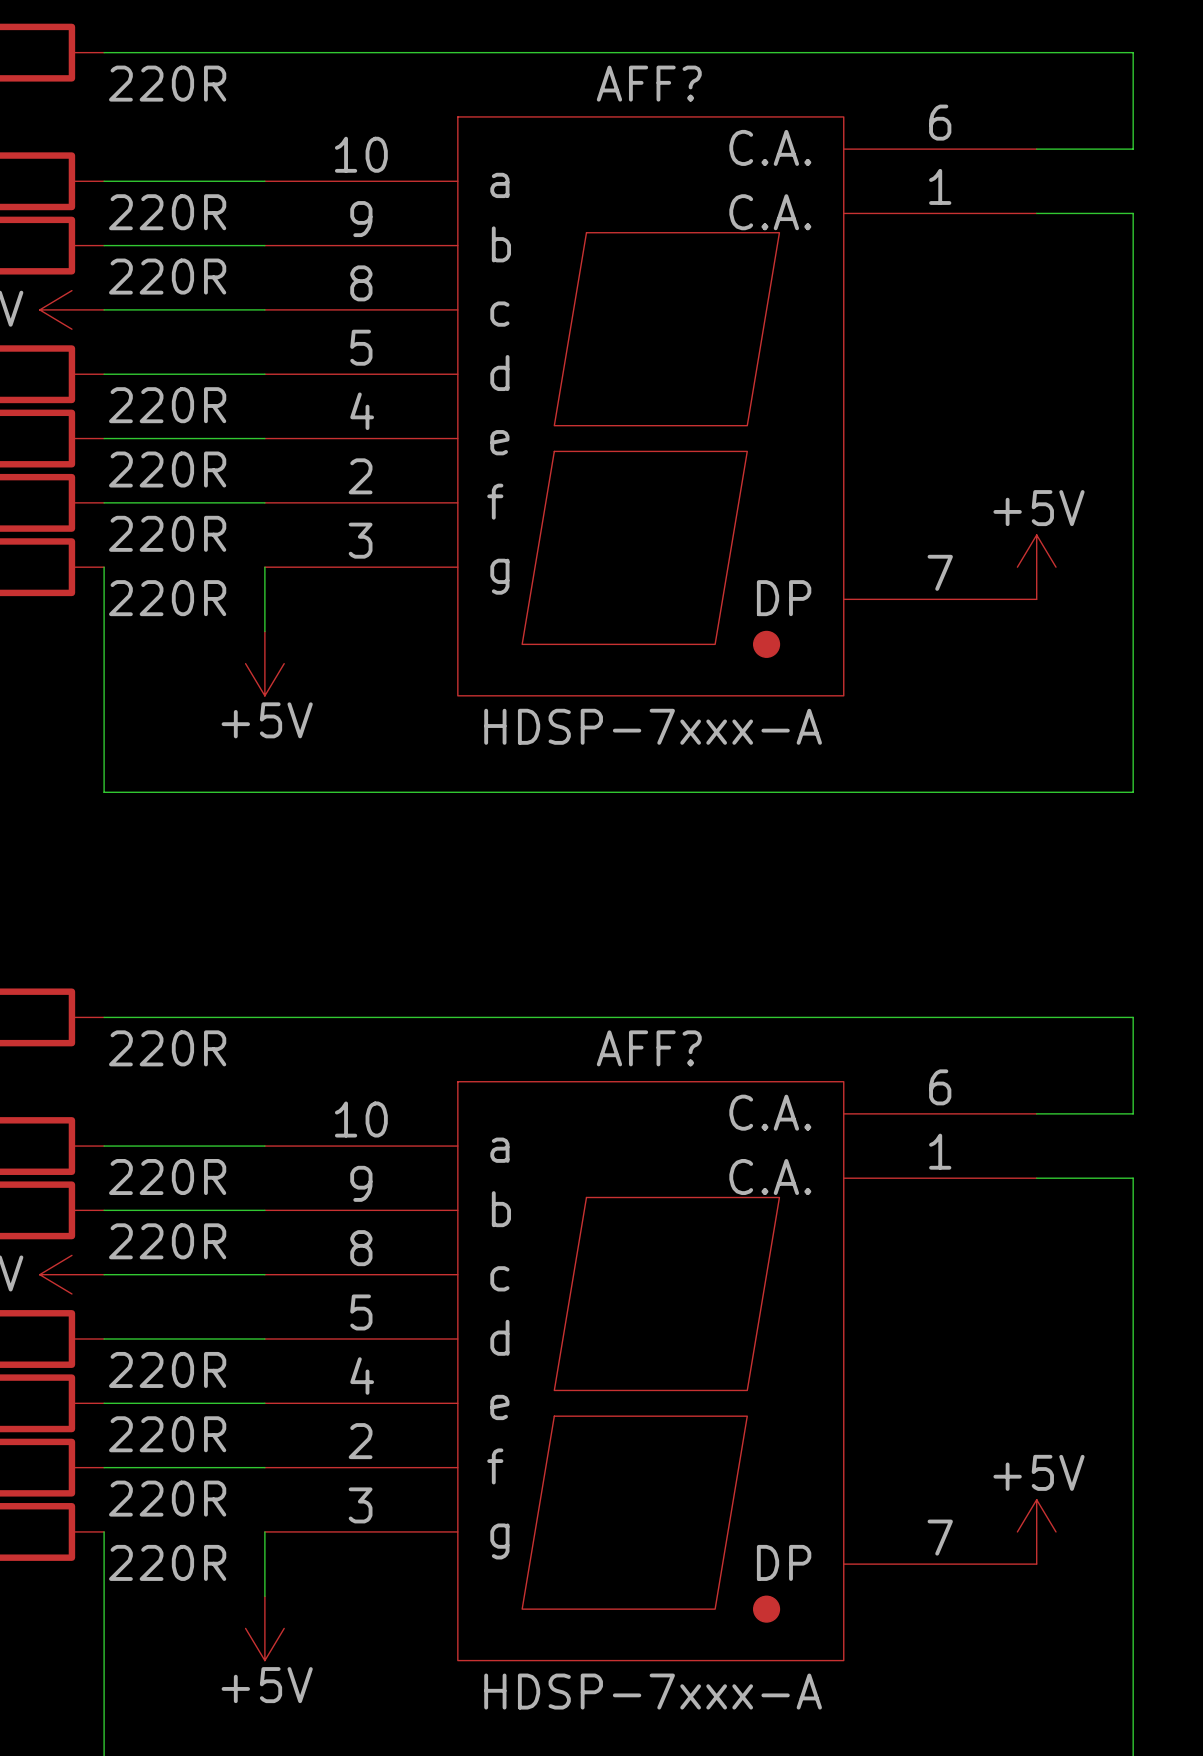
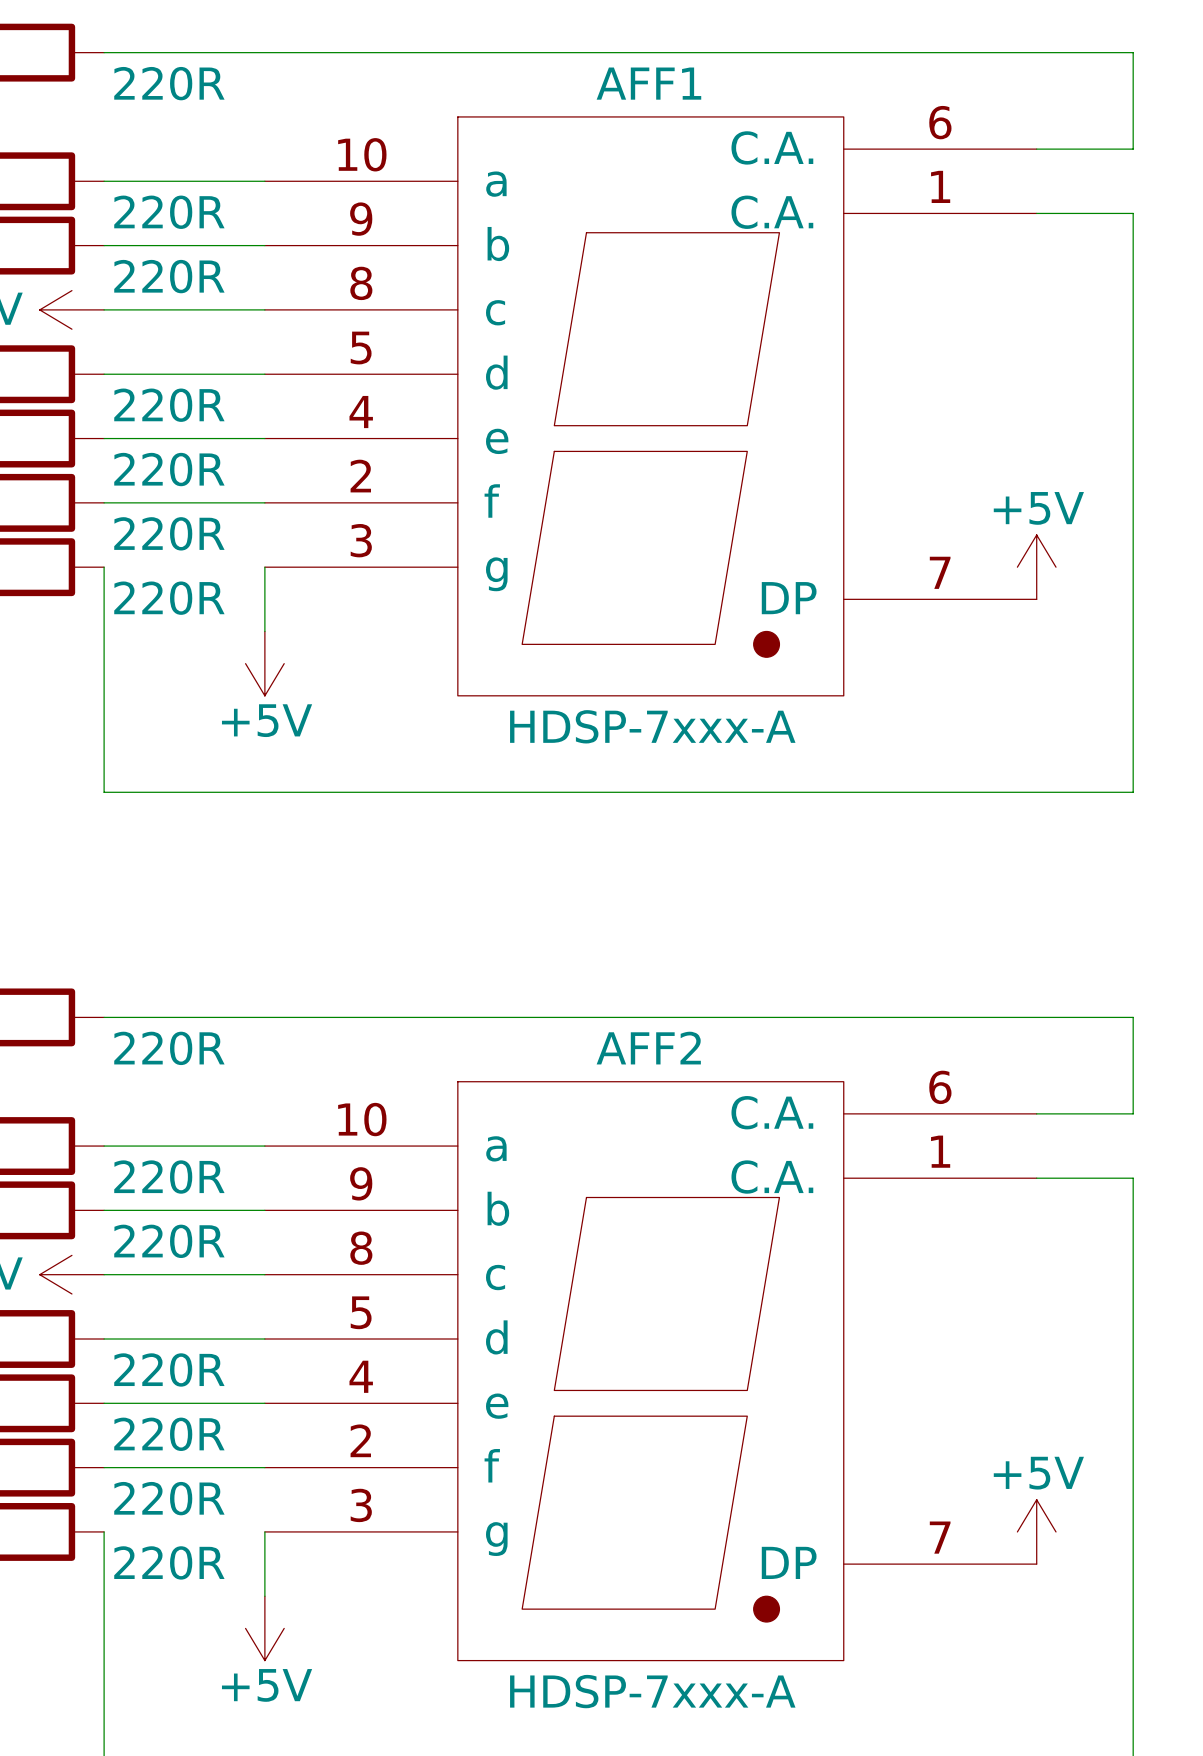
AFF? name: AFF? (649, 83) -> AFF1 (648, 83)
AFF? name: AFF? (649, 1048) -> AFF2 (648, 1048)

